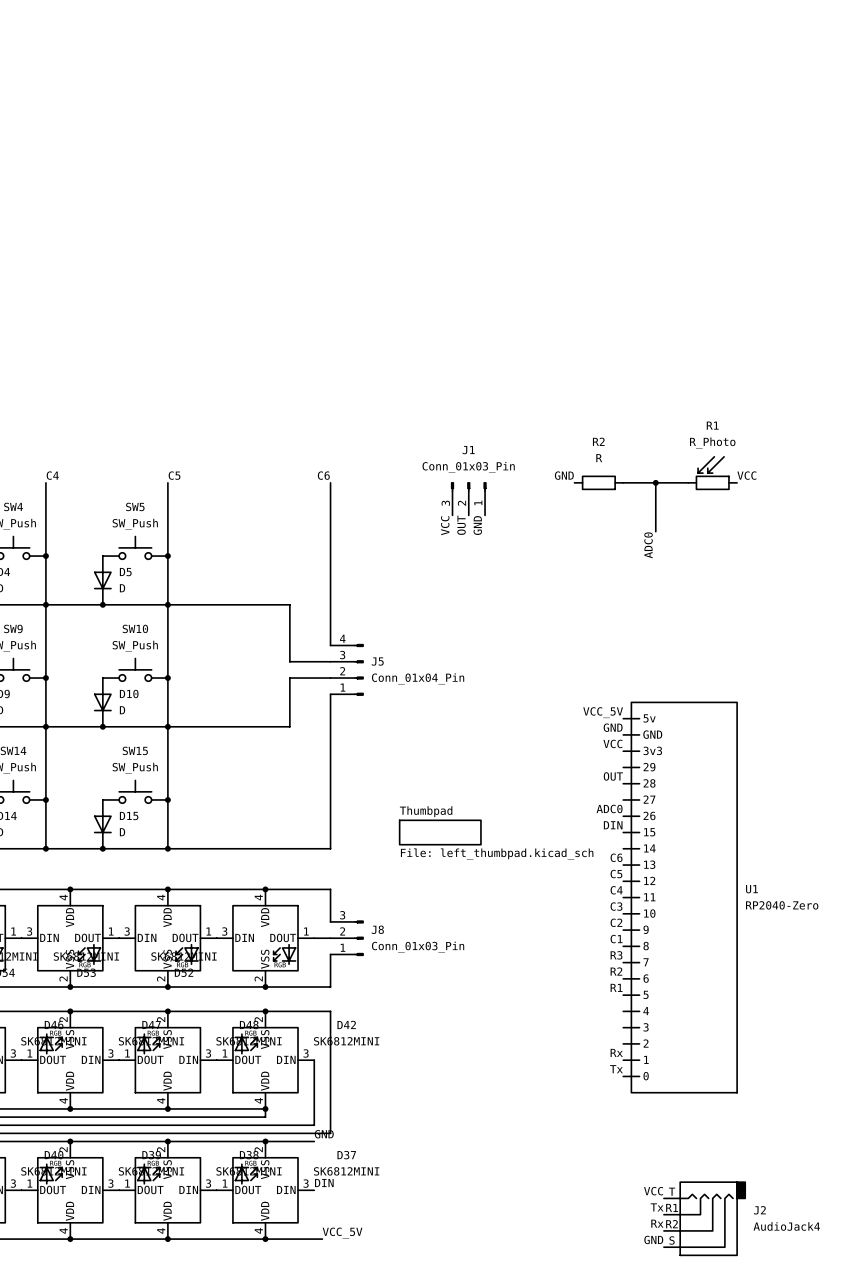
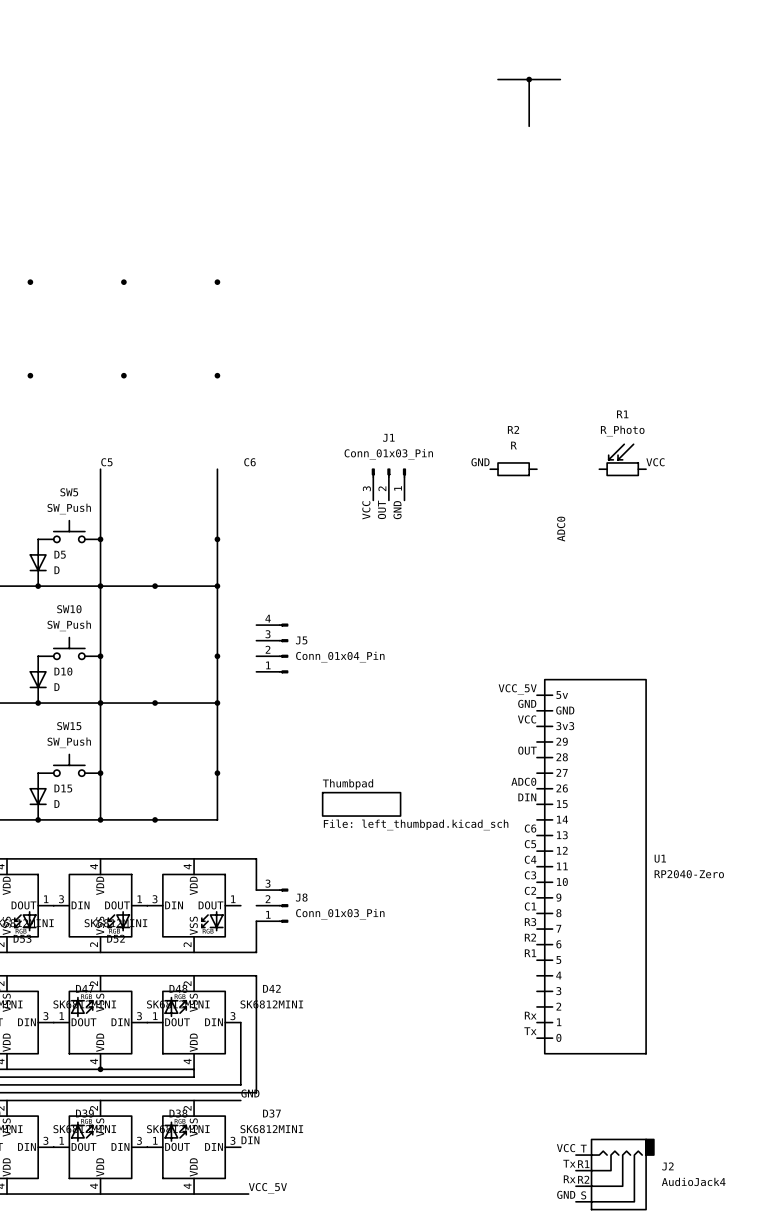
wire: none -> (498, 79) (560, 79)
wire: none -> (529, 79) (529, 126)
junction: none -> (529, 79)
junction: none -> (30, 282)
junction: none -> (123, 282)
junction: none -> (217, 282)
junction: none -> (30, 375)
junction: none -> (123, 375)
junction: none -> (217, 375)
wire: none -> (217, 469) (217, 586)
wire: (330, 482) (330, 645) -> none
wire: (623, 482) (688, 482) -> none
wire: (655, 482) (655, 531) -> none
junction: (655, 482) -> none
junction: none -> (217, 539)
junction: none -> (155, 586)
junction: none -> (217, 586)
wire: (289, 661) (330, 661) -> (217, 640) (217, 656)
wire: (289, 678) (330, 678) -> none
junction: none -> (217, 656)
wire: (330, 694) (330, 848) (289, 848) -> (217, 703) (217, 819)
junction: none -> (155, 703)
junction: none -> (217, 703)
junction: none -> (217, 773)
junction: none -> (155, 819)
junction: (70, 889) -> none
junction: (167, 889) -> none
junction: (265, 889) -> none
wire: (314, 938) (330, 938) -> none
junction: (70, 987) -> none
junction: (167, 987) -> none
junction: (265, 987) -> none
junction: (70, 1011) -> none
junction: (167, 1011) -> none
junction: (265, 1011) -> none
junction: (70, 1108) -> none
junction: (265, 1108) -> none
junction: (70, 1141) -> none
junction: (167, 1141) -> none
junction: (265, 1141) -> none
junction: (70, 1239) -> none
junction: (167, 1239) -> none
junction: (265, 1239) -> none

